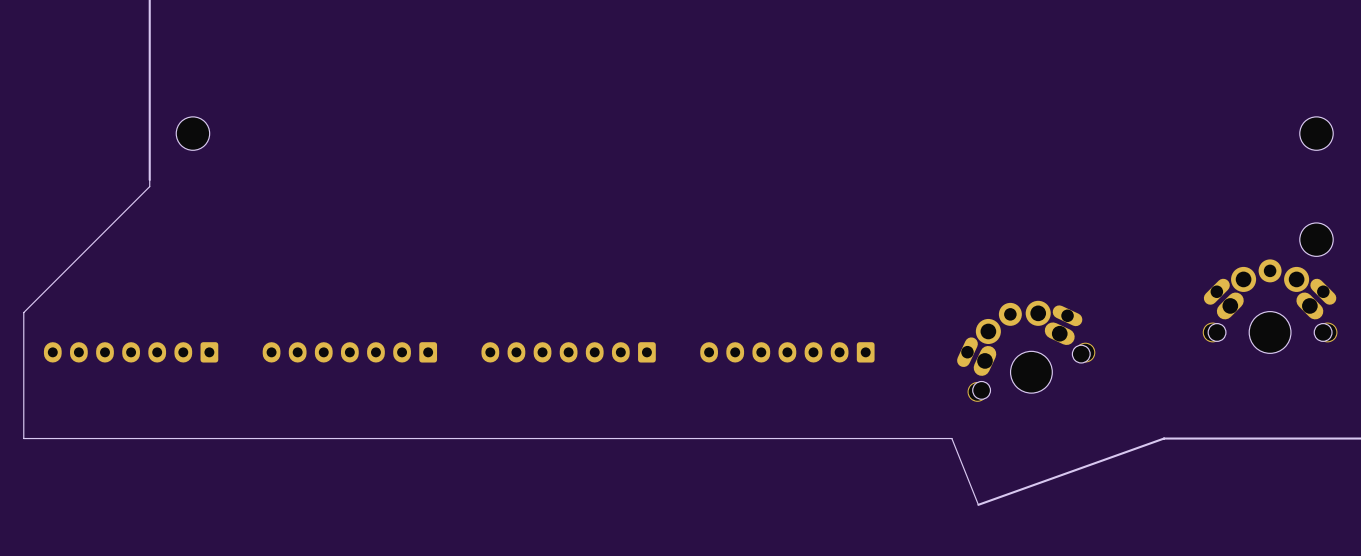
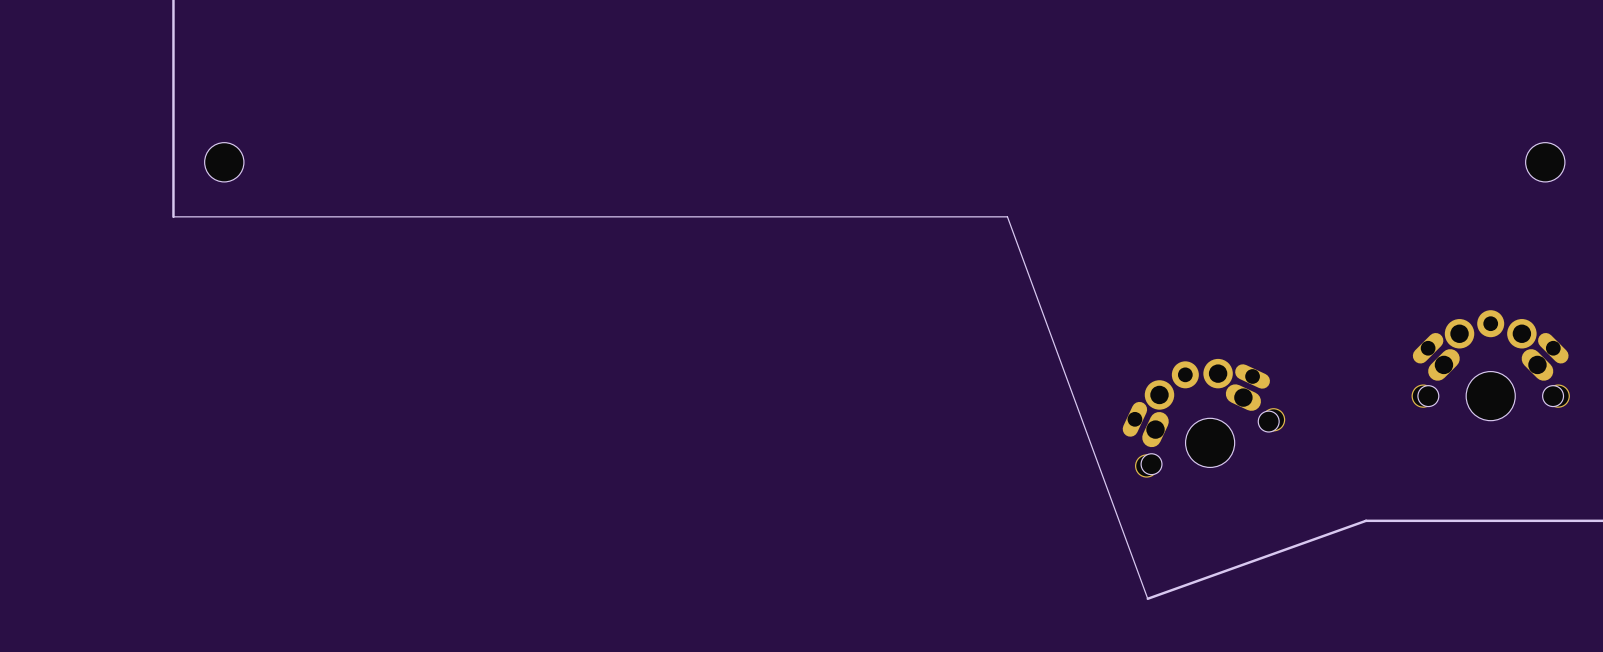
board edge: (149, 179) (149, 186) (23, 312) (23, 438) (951, 438) (978, 504) -> (173, 216) (1007, 216) (1147, 598)
part: (1316, 239) -> none
part: (131, 352) -> none
part: (349, 352) -> none
part: (568, 352) -> none
part: (787, 352) -> none

